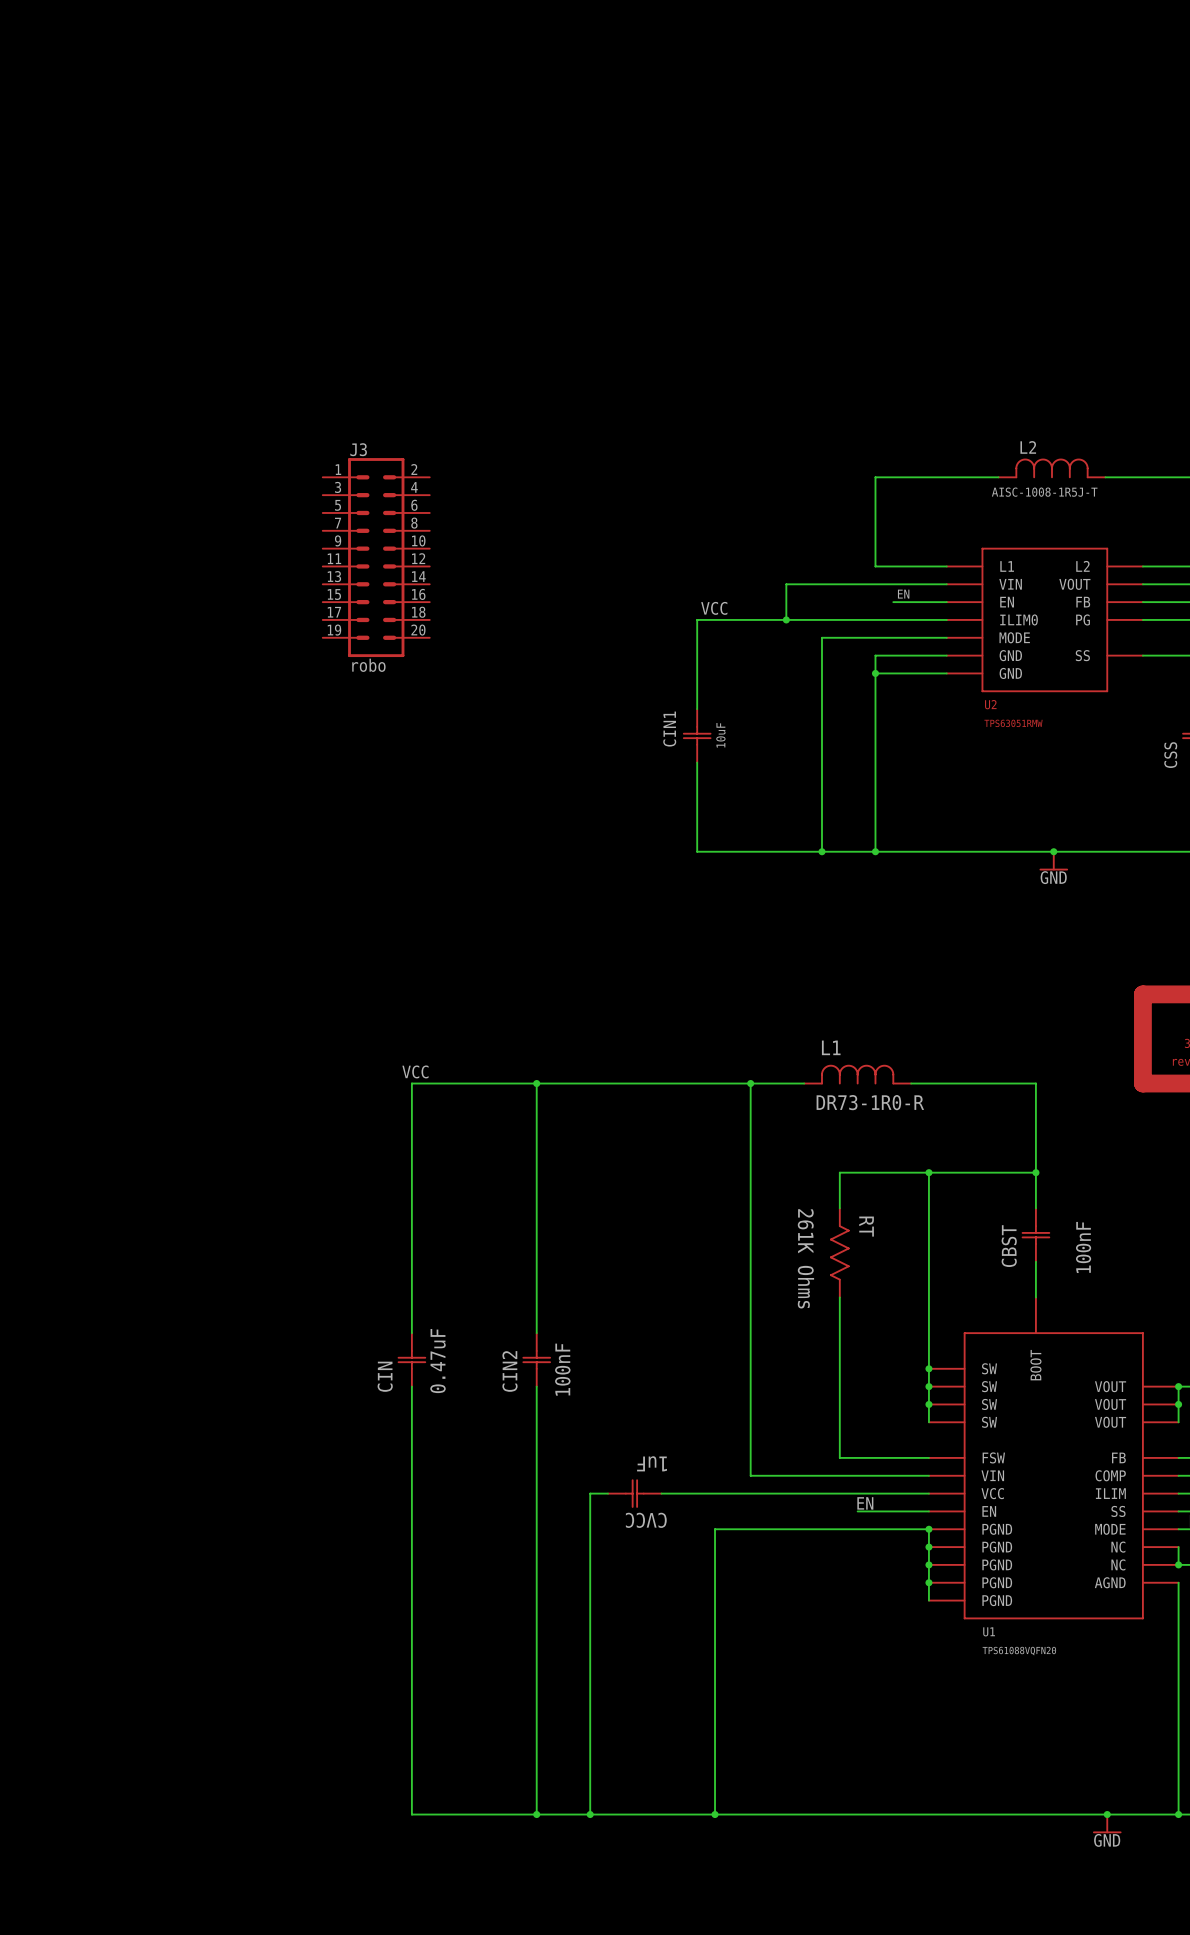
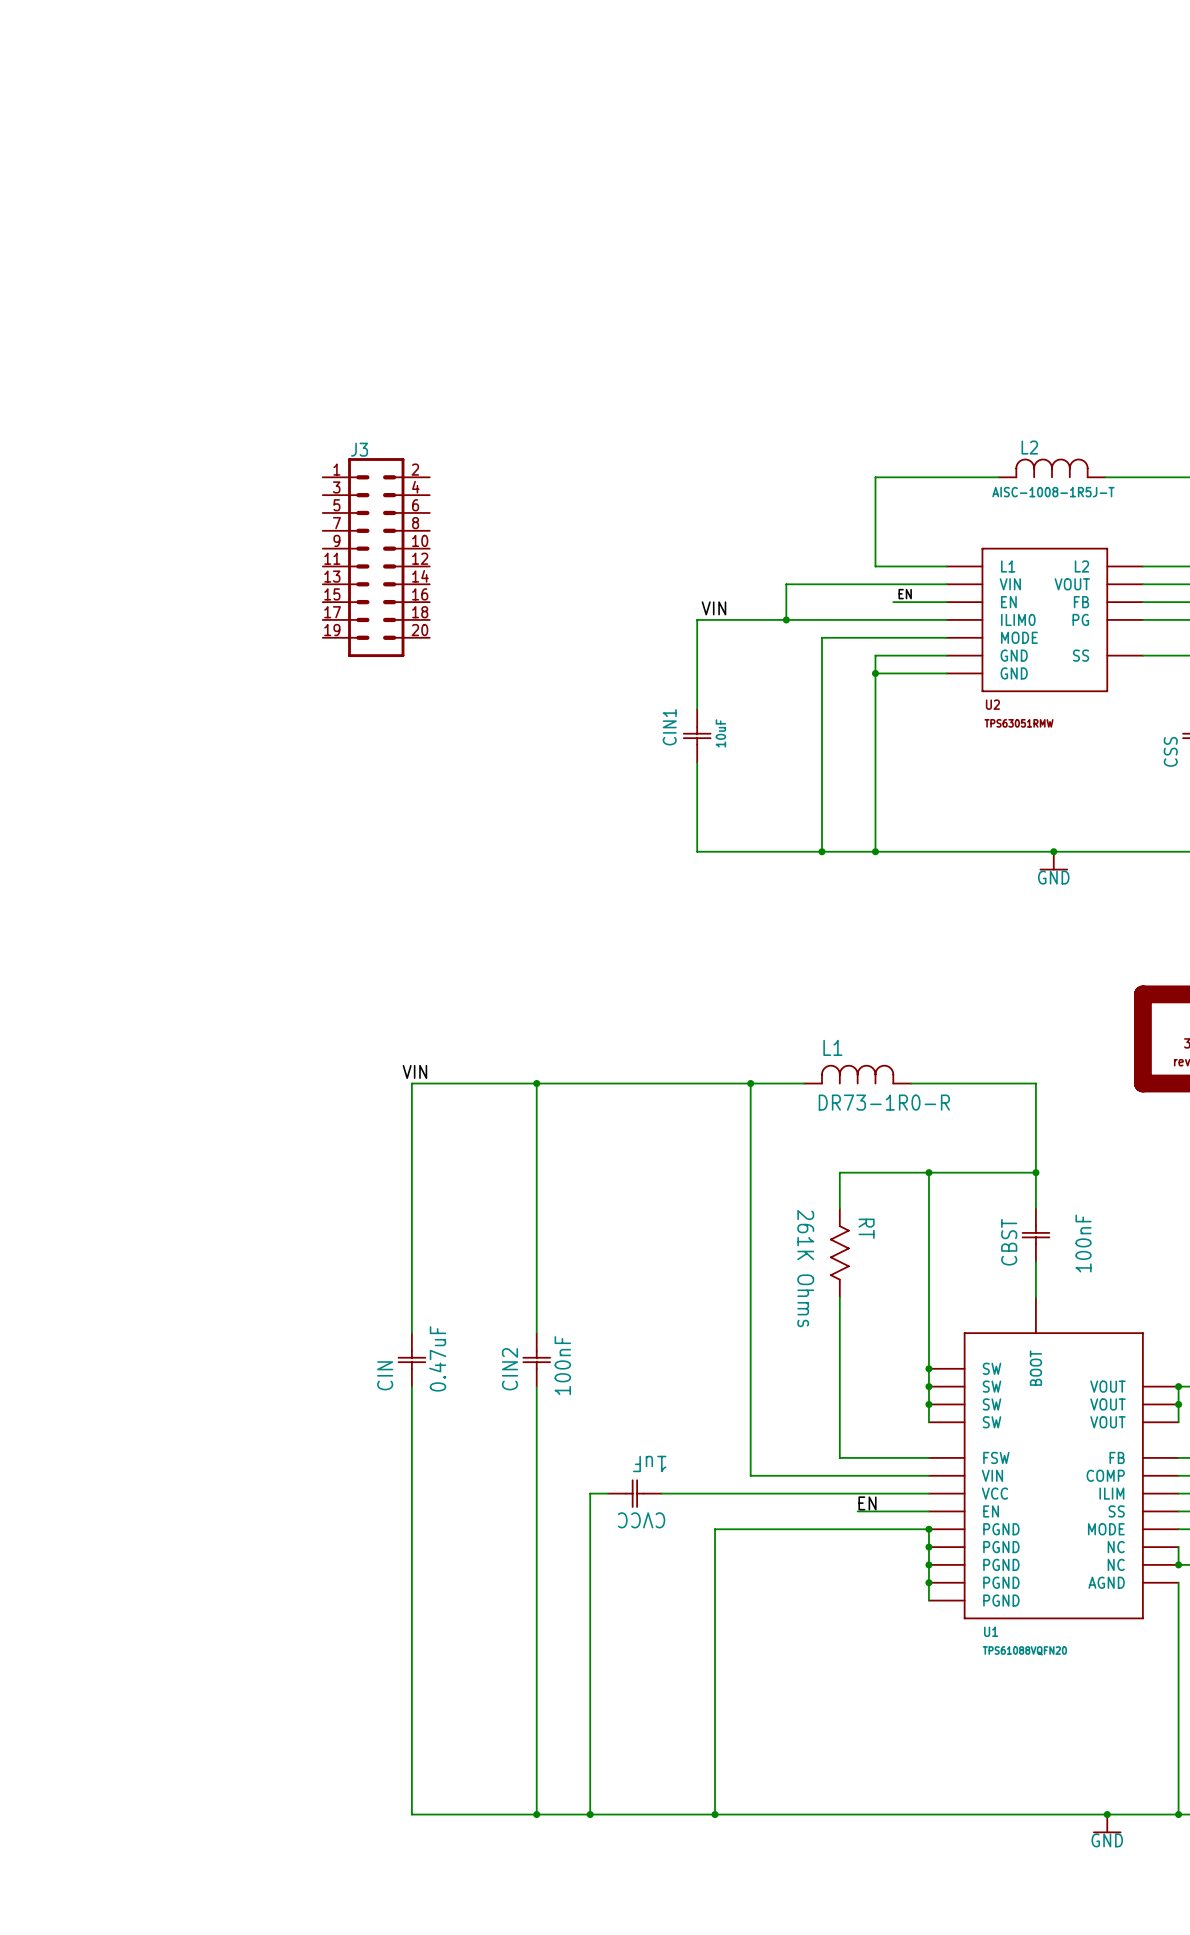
label: VCC (714, 608) -> VIN (713, 608)
J3 value: robo (368, 665) -> none
label: VCC (415, 1071) -> VIN (414, 1071)

